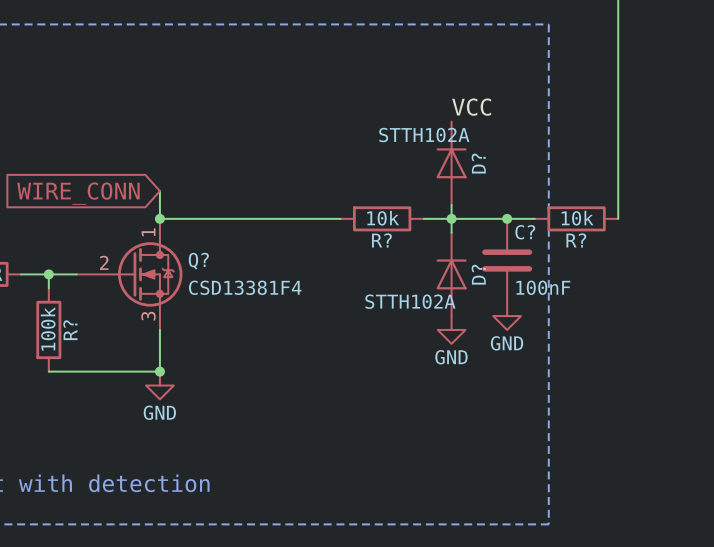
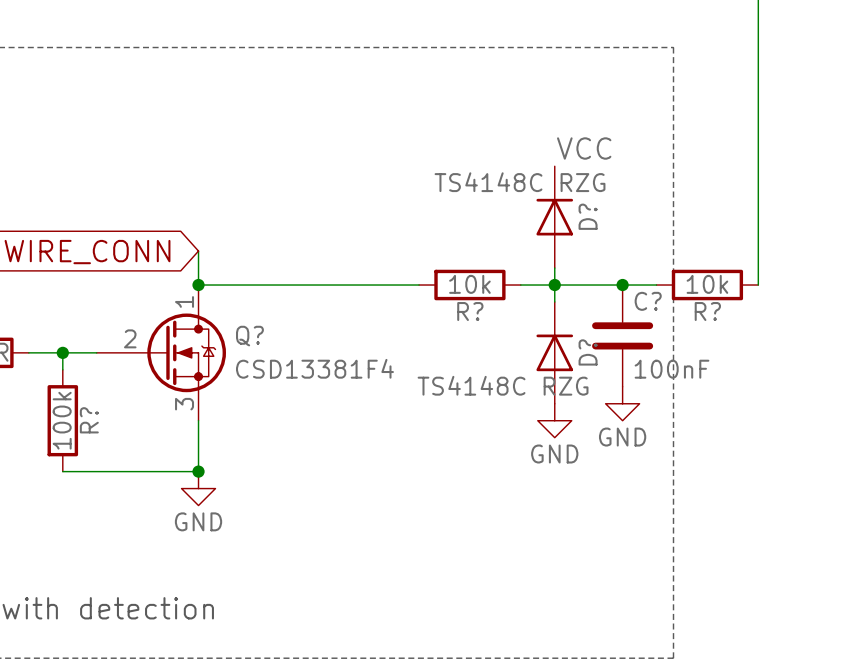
D? value: STTH102A (424, 135) -> TS4148C RZG (520, 182)
D? value: STTH102A (410, 301) -> TS4148C RZG (503, 385)

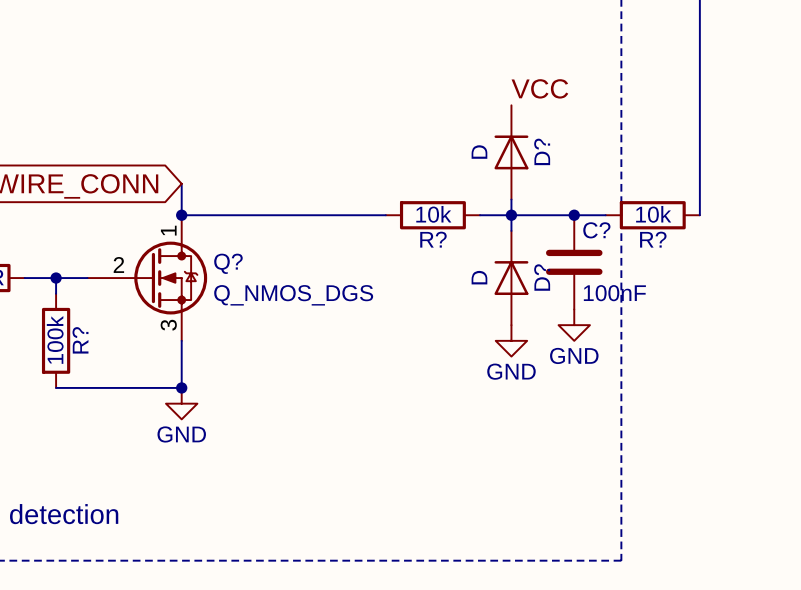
D? value: TS4148C RZG (520, 182) -> D (479, 152)
Q? value: CSD13381F4 (314, 368) -> Q_NMOS_DGS (293, 295)
D? value: TS4148C RZG (503, 385) -> D (479, 277)

